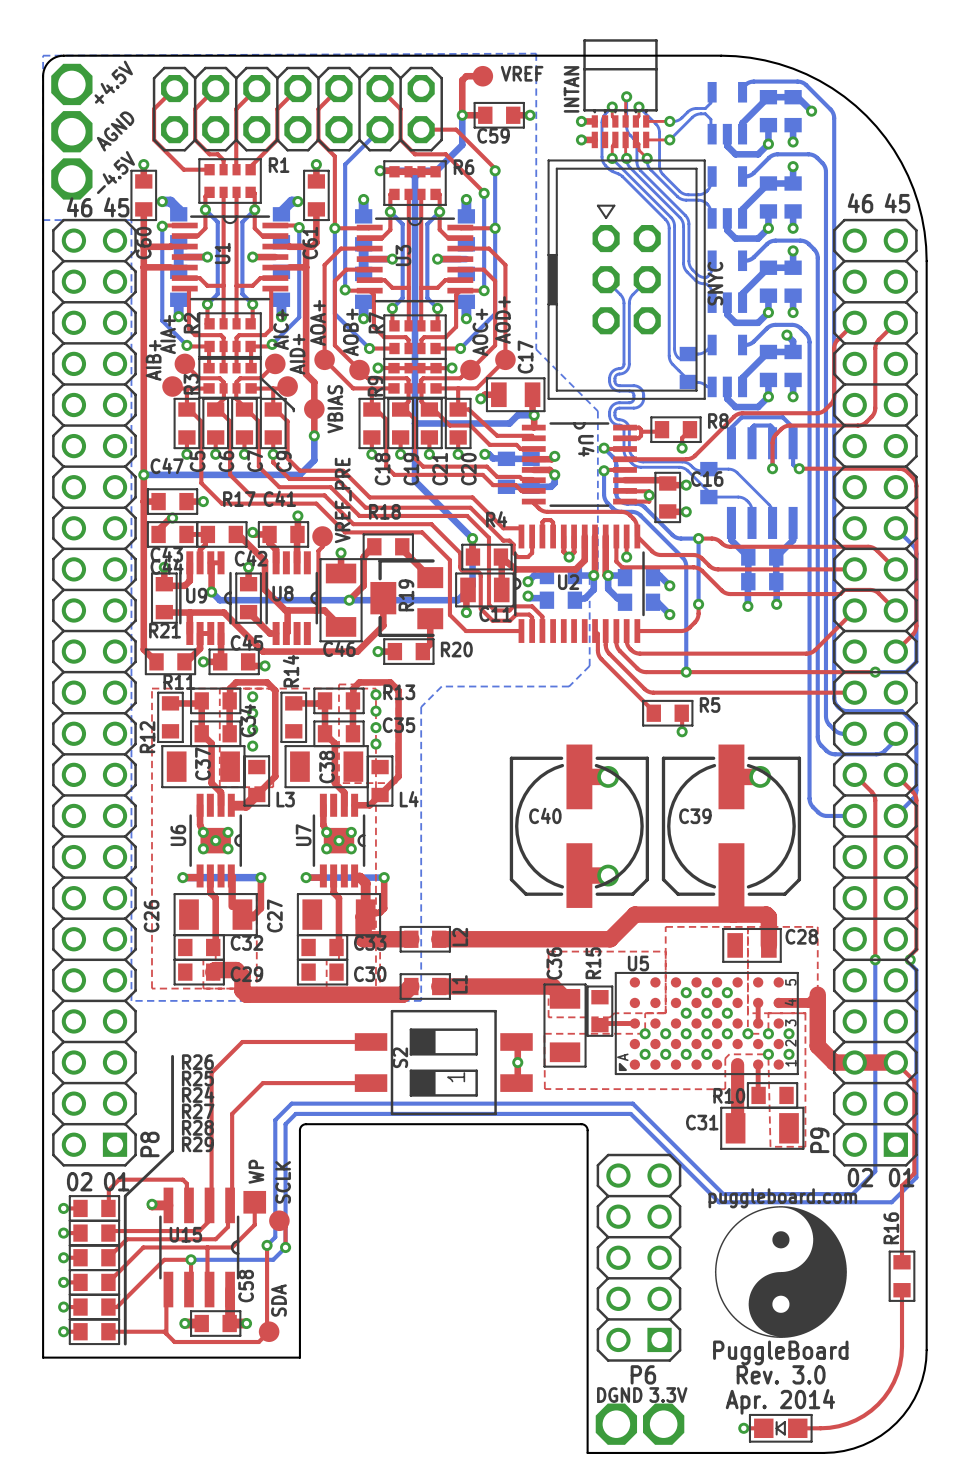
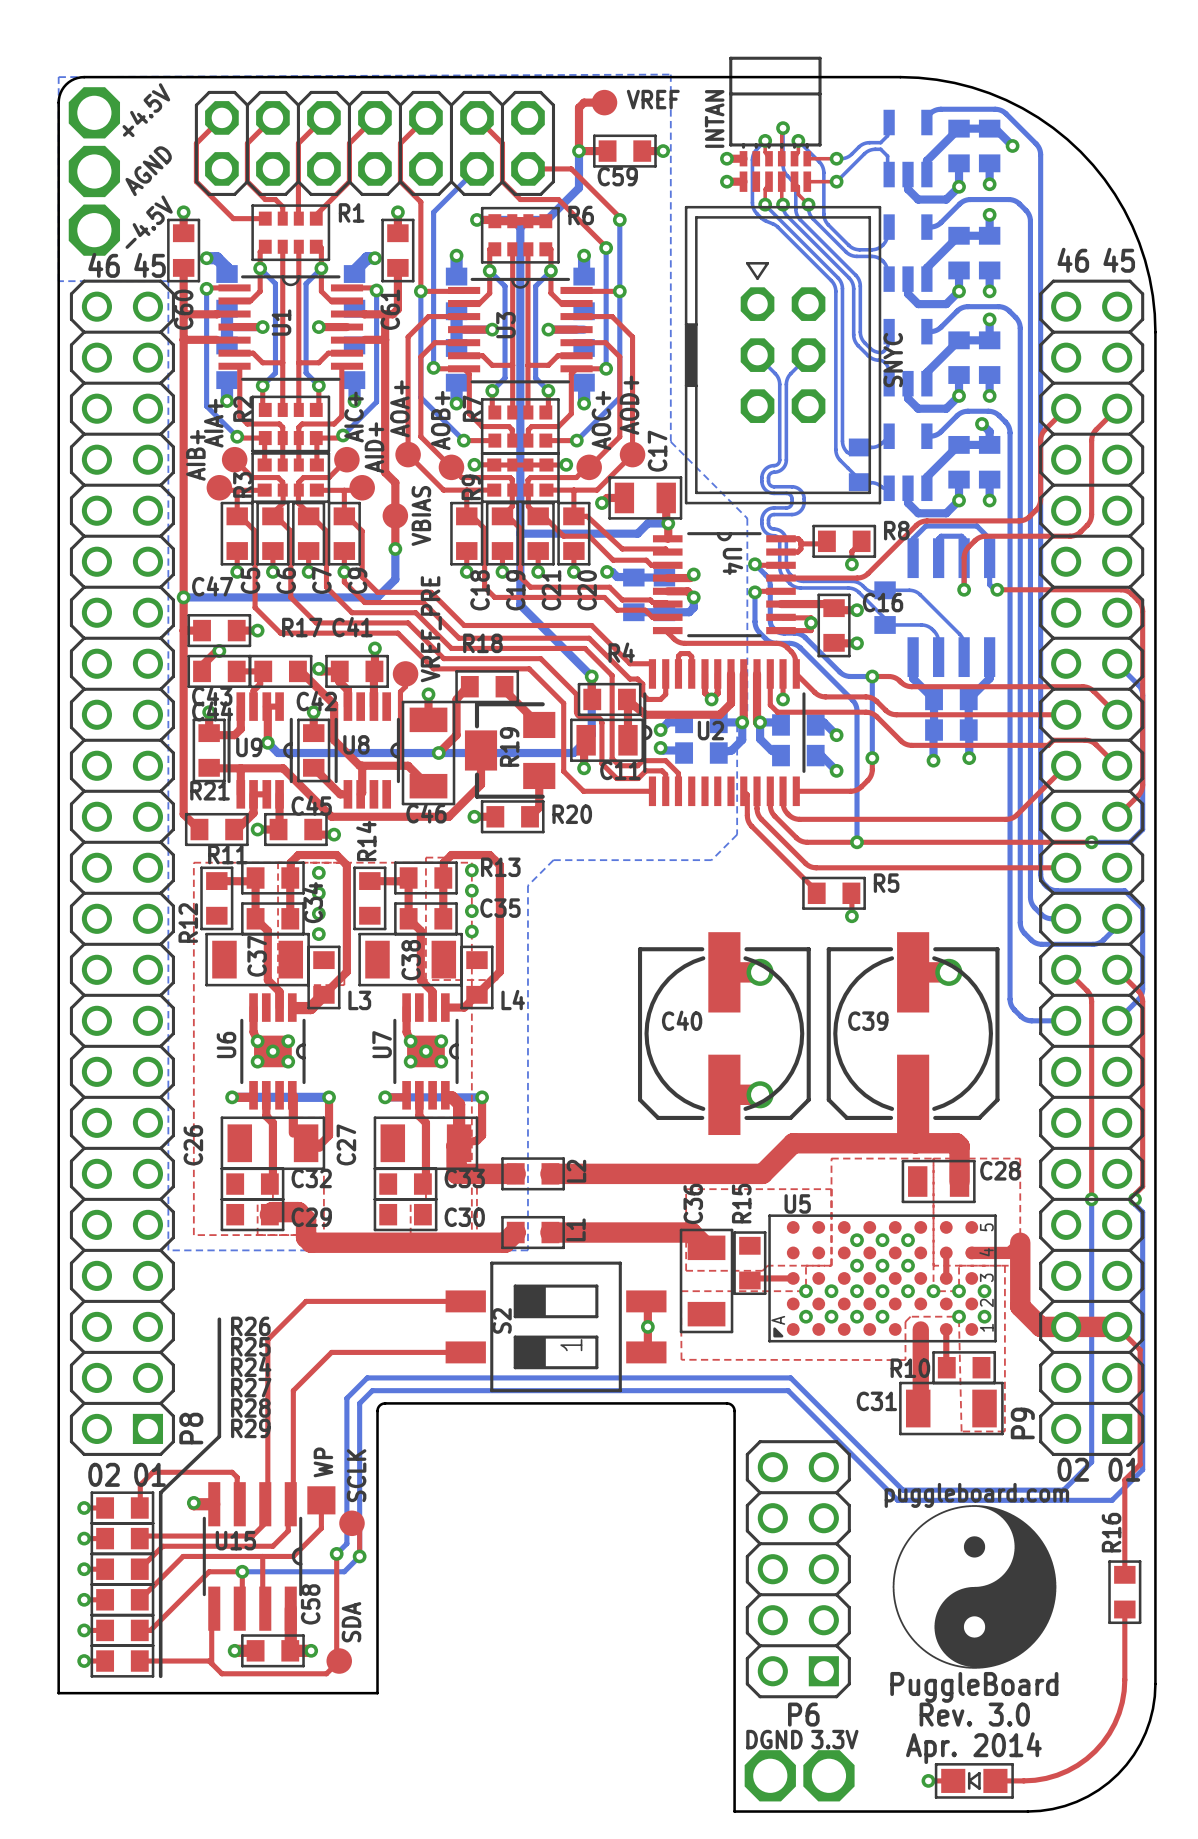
line: (260, 378) (293, 411) -> none

